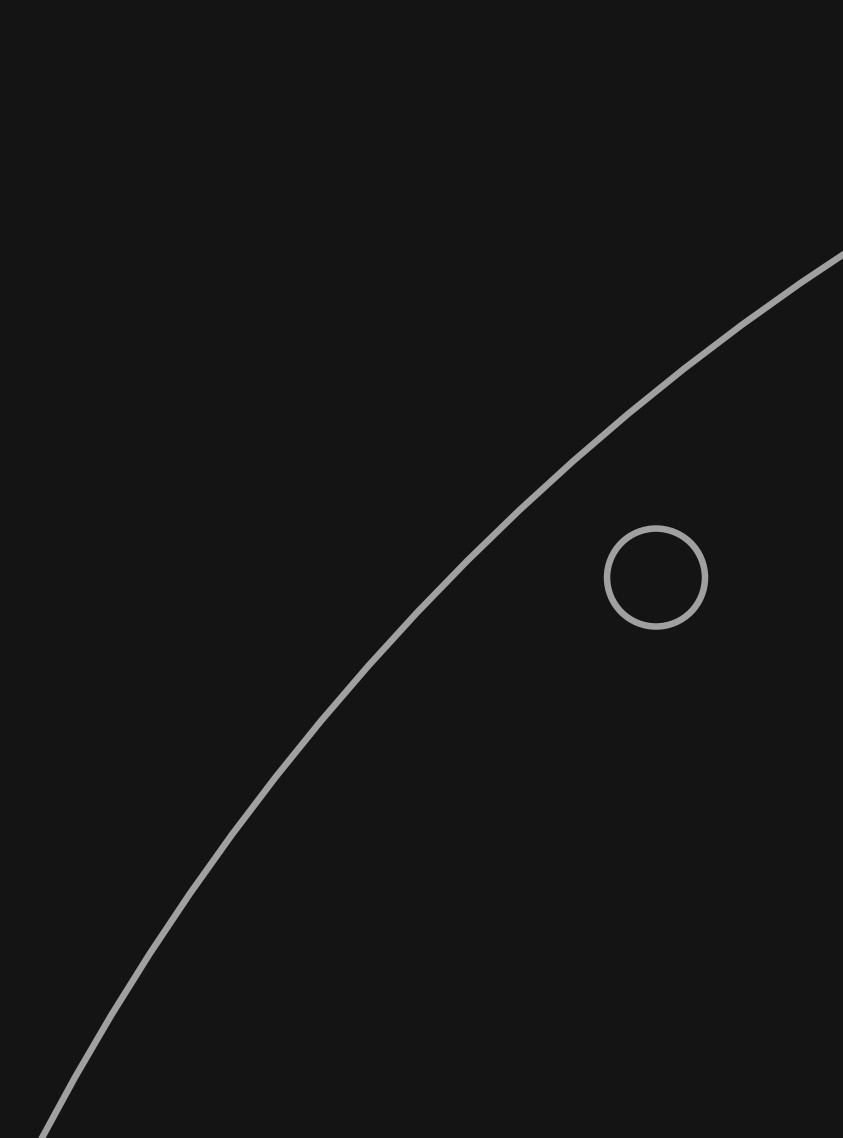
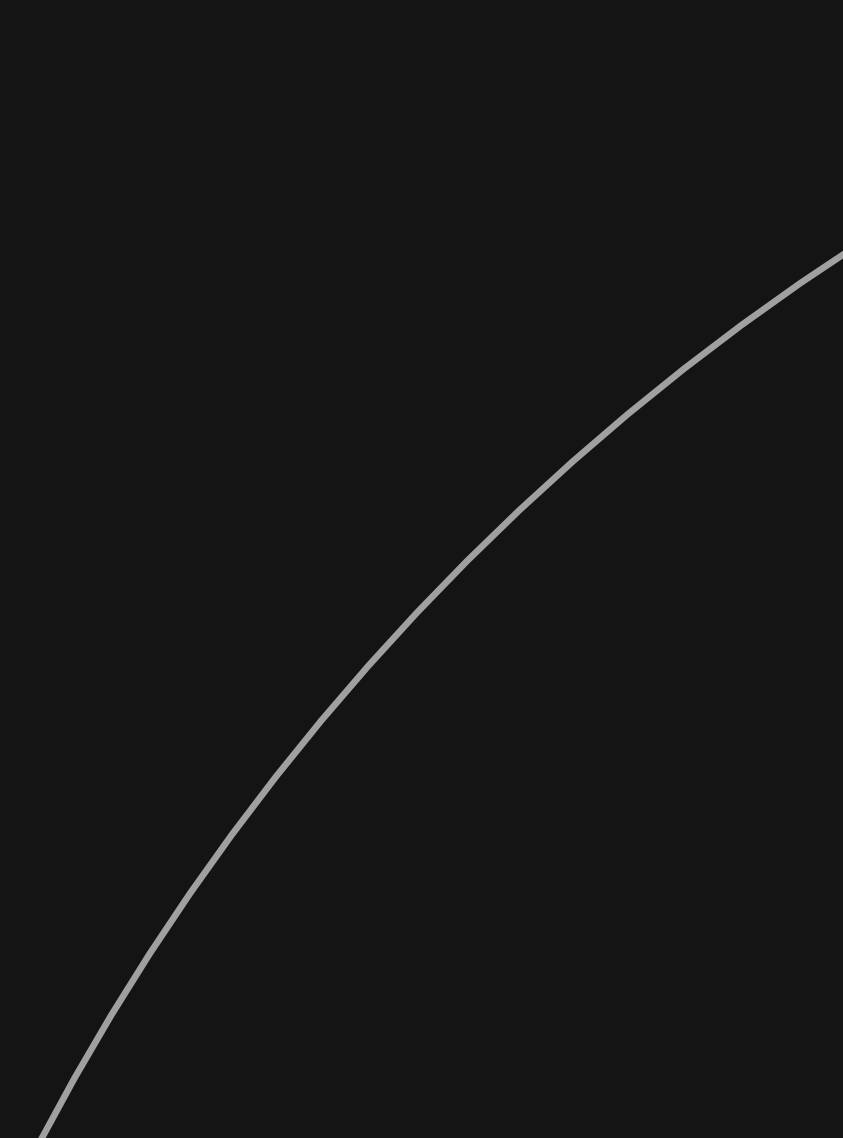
round board edge: [603, 525, 709, 630] -> none

